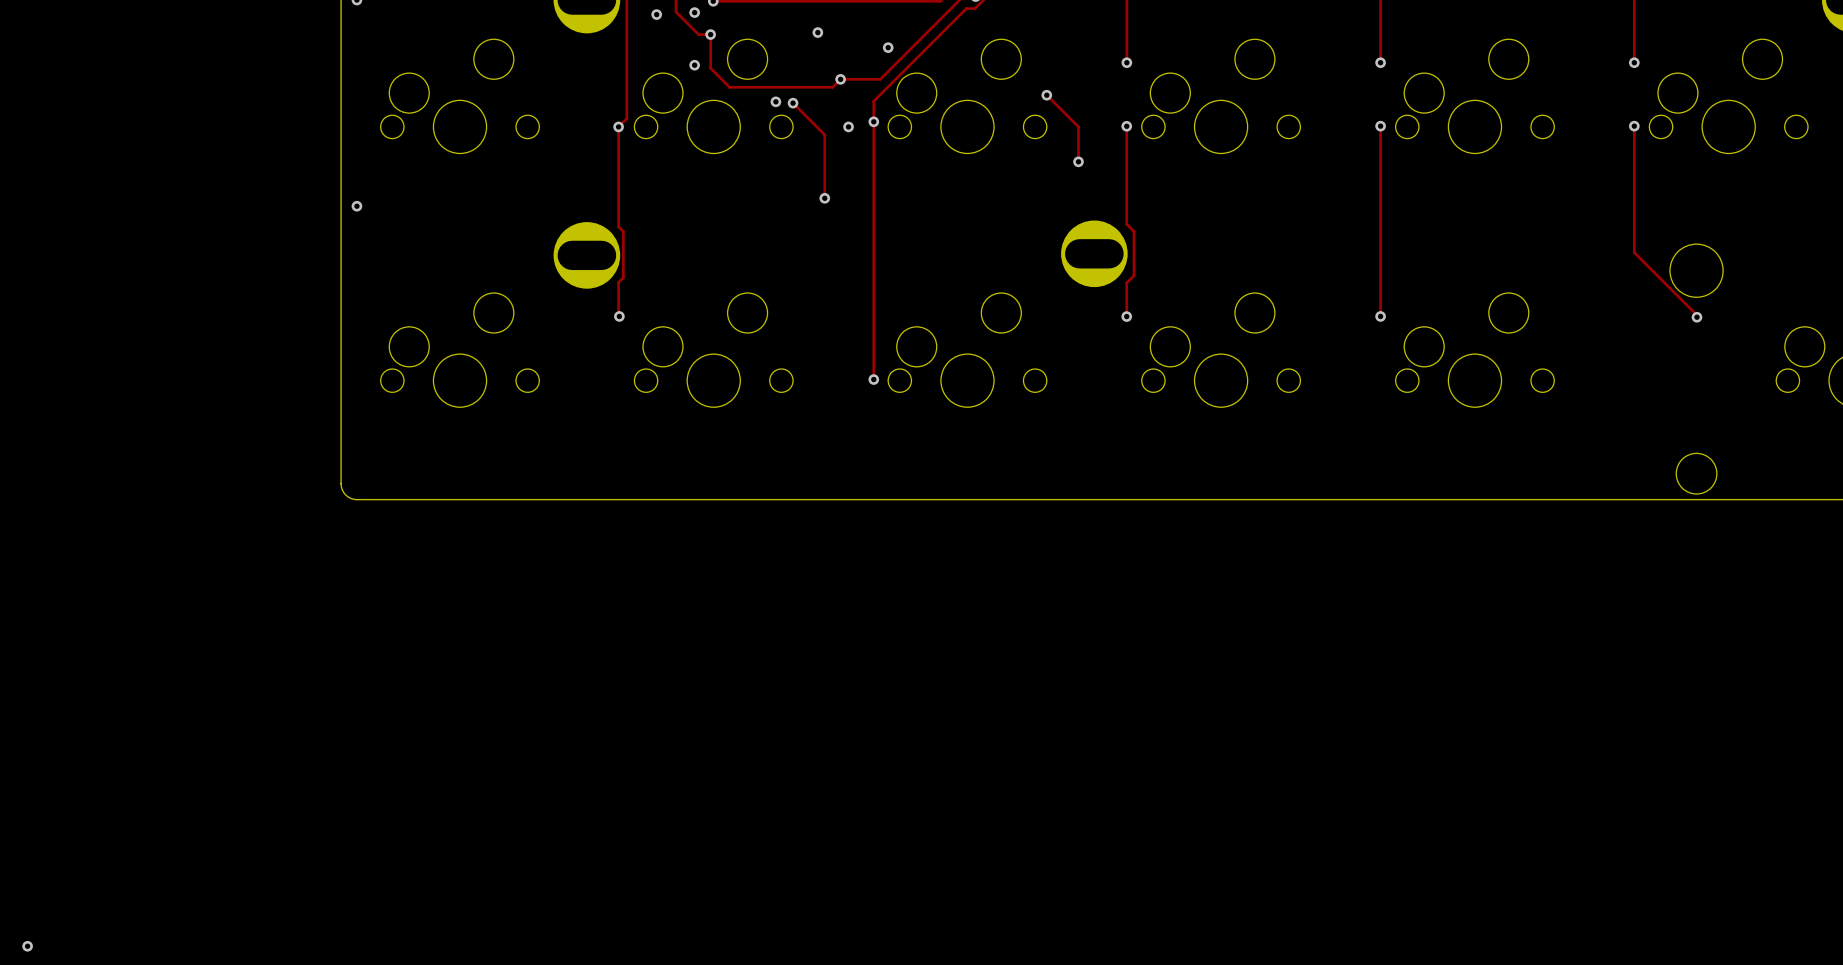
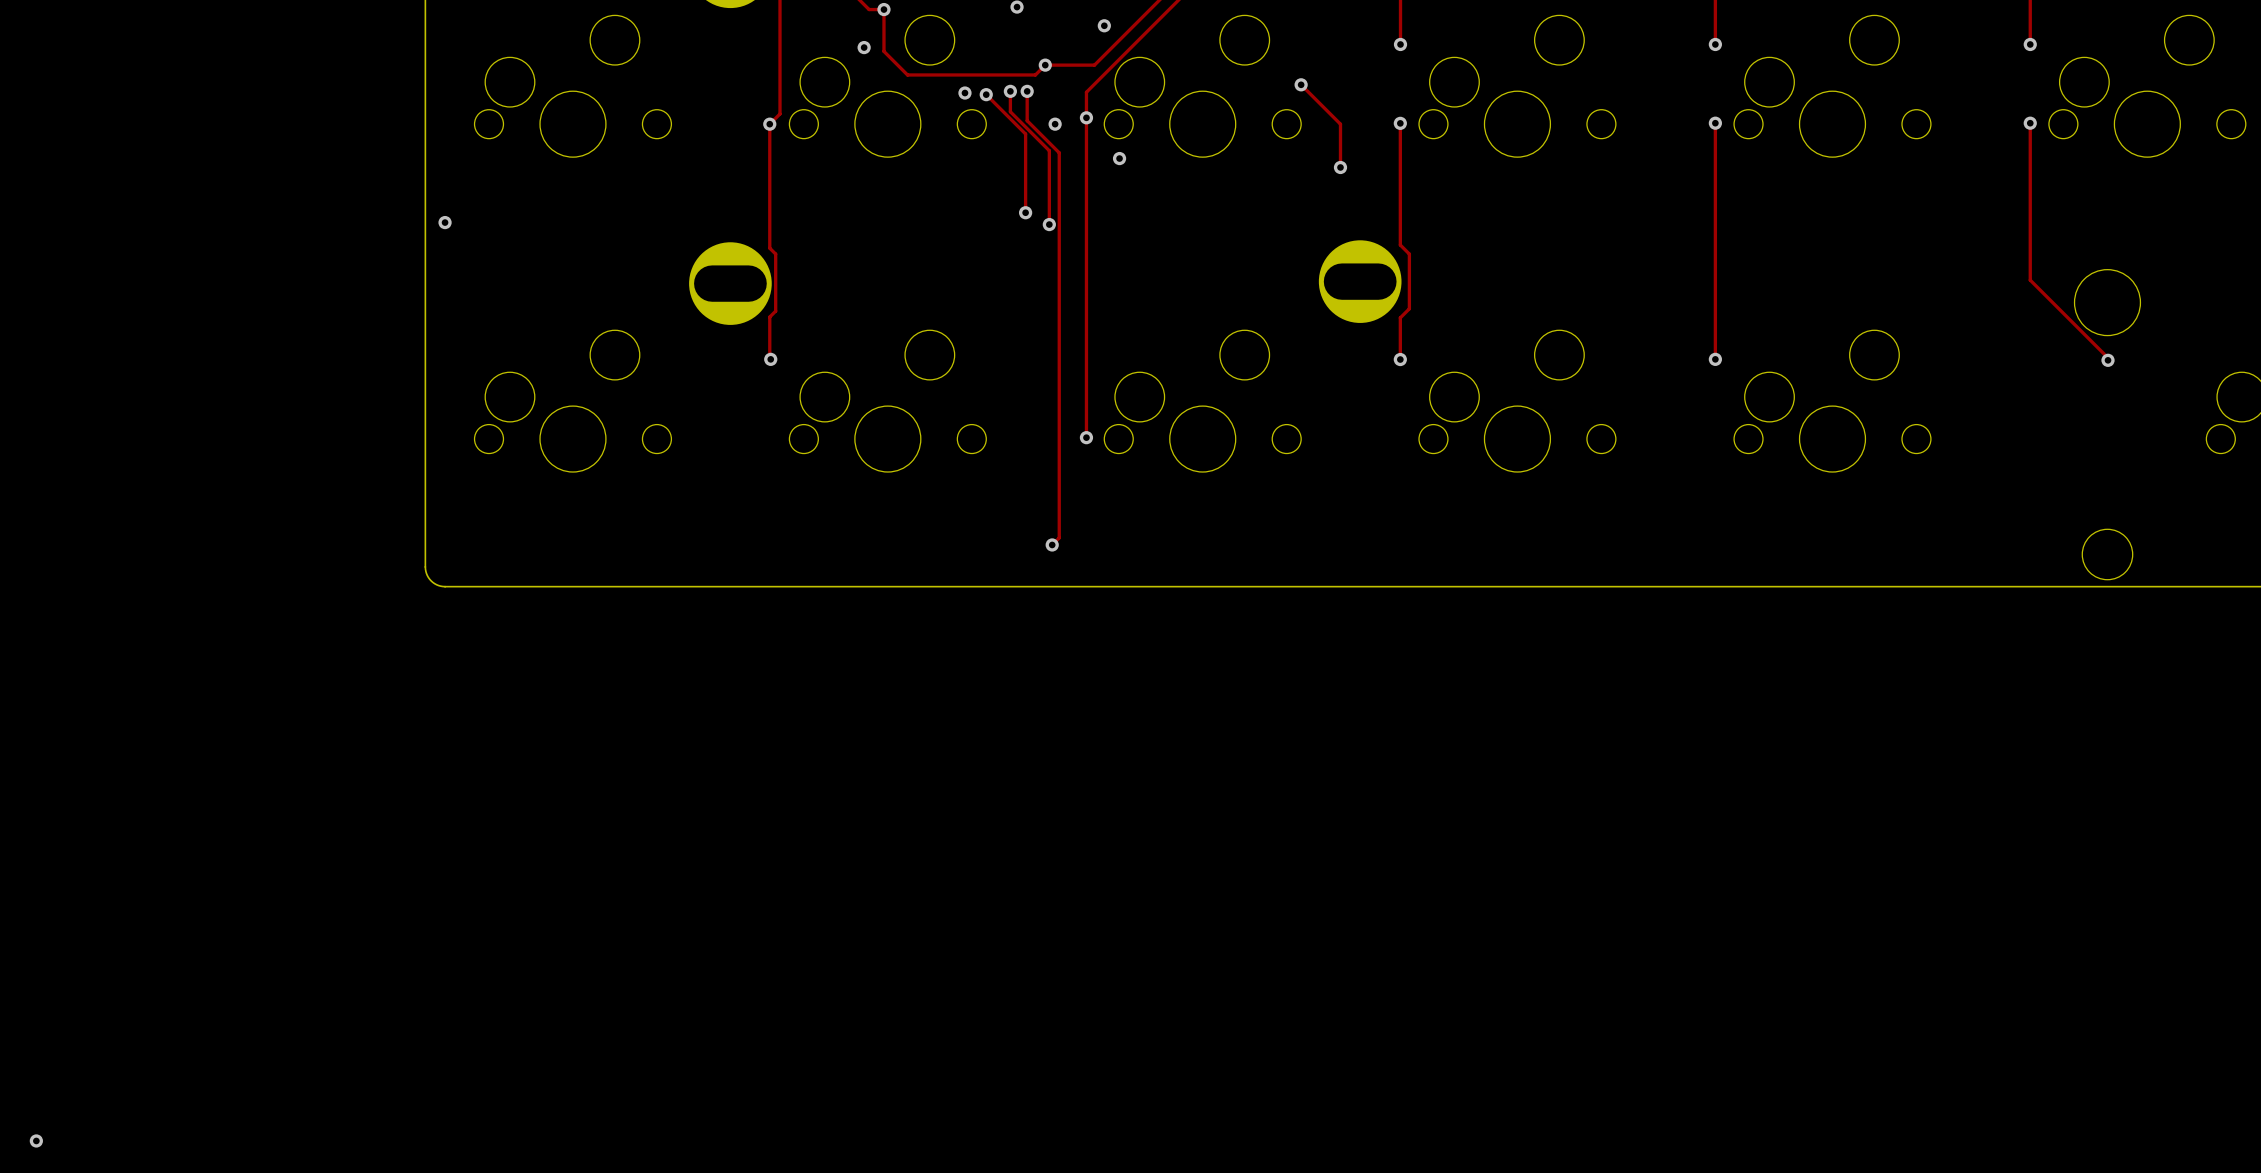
track: none -> (1010, 91) (1010, 111) (1049, 150) (1049, 224)
via: none -> (1010, 91)
track: none -> (1027, 91) (1027, 120) (1059, 152) (1059, 537) (1052, 544)
via: none -> (1027, 91)
via: none -> (1119, 158)
via: none -> (1049, 224)
via: none -> (1052, 544)

